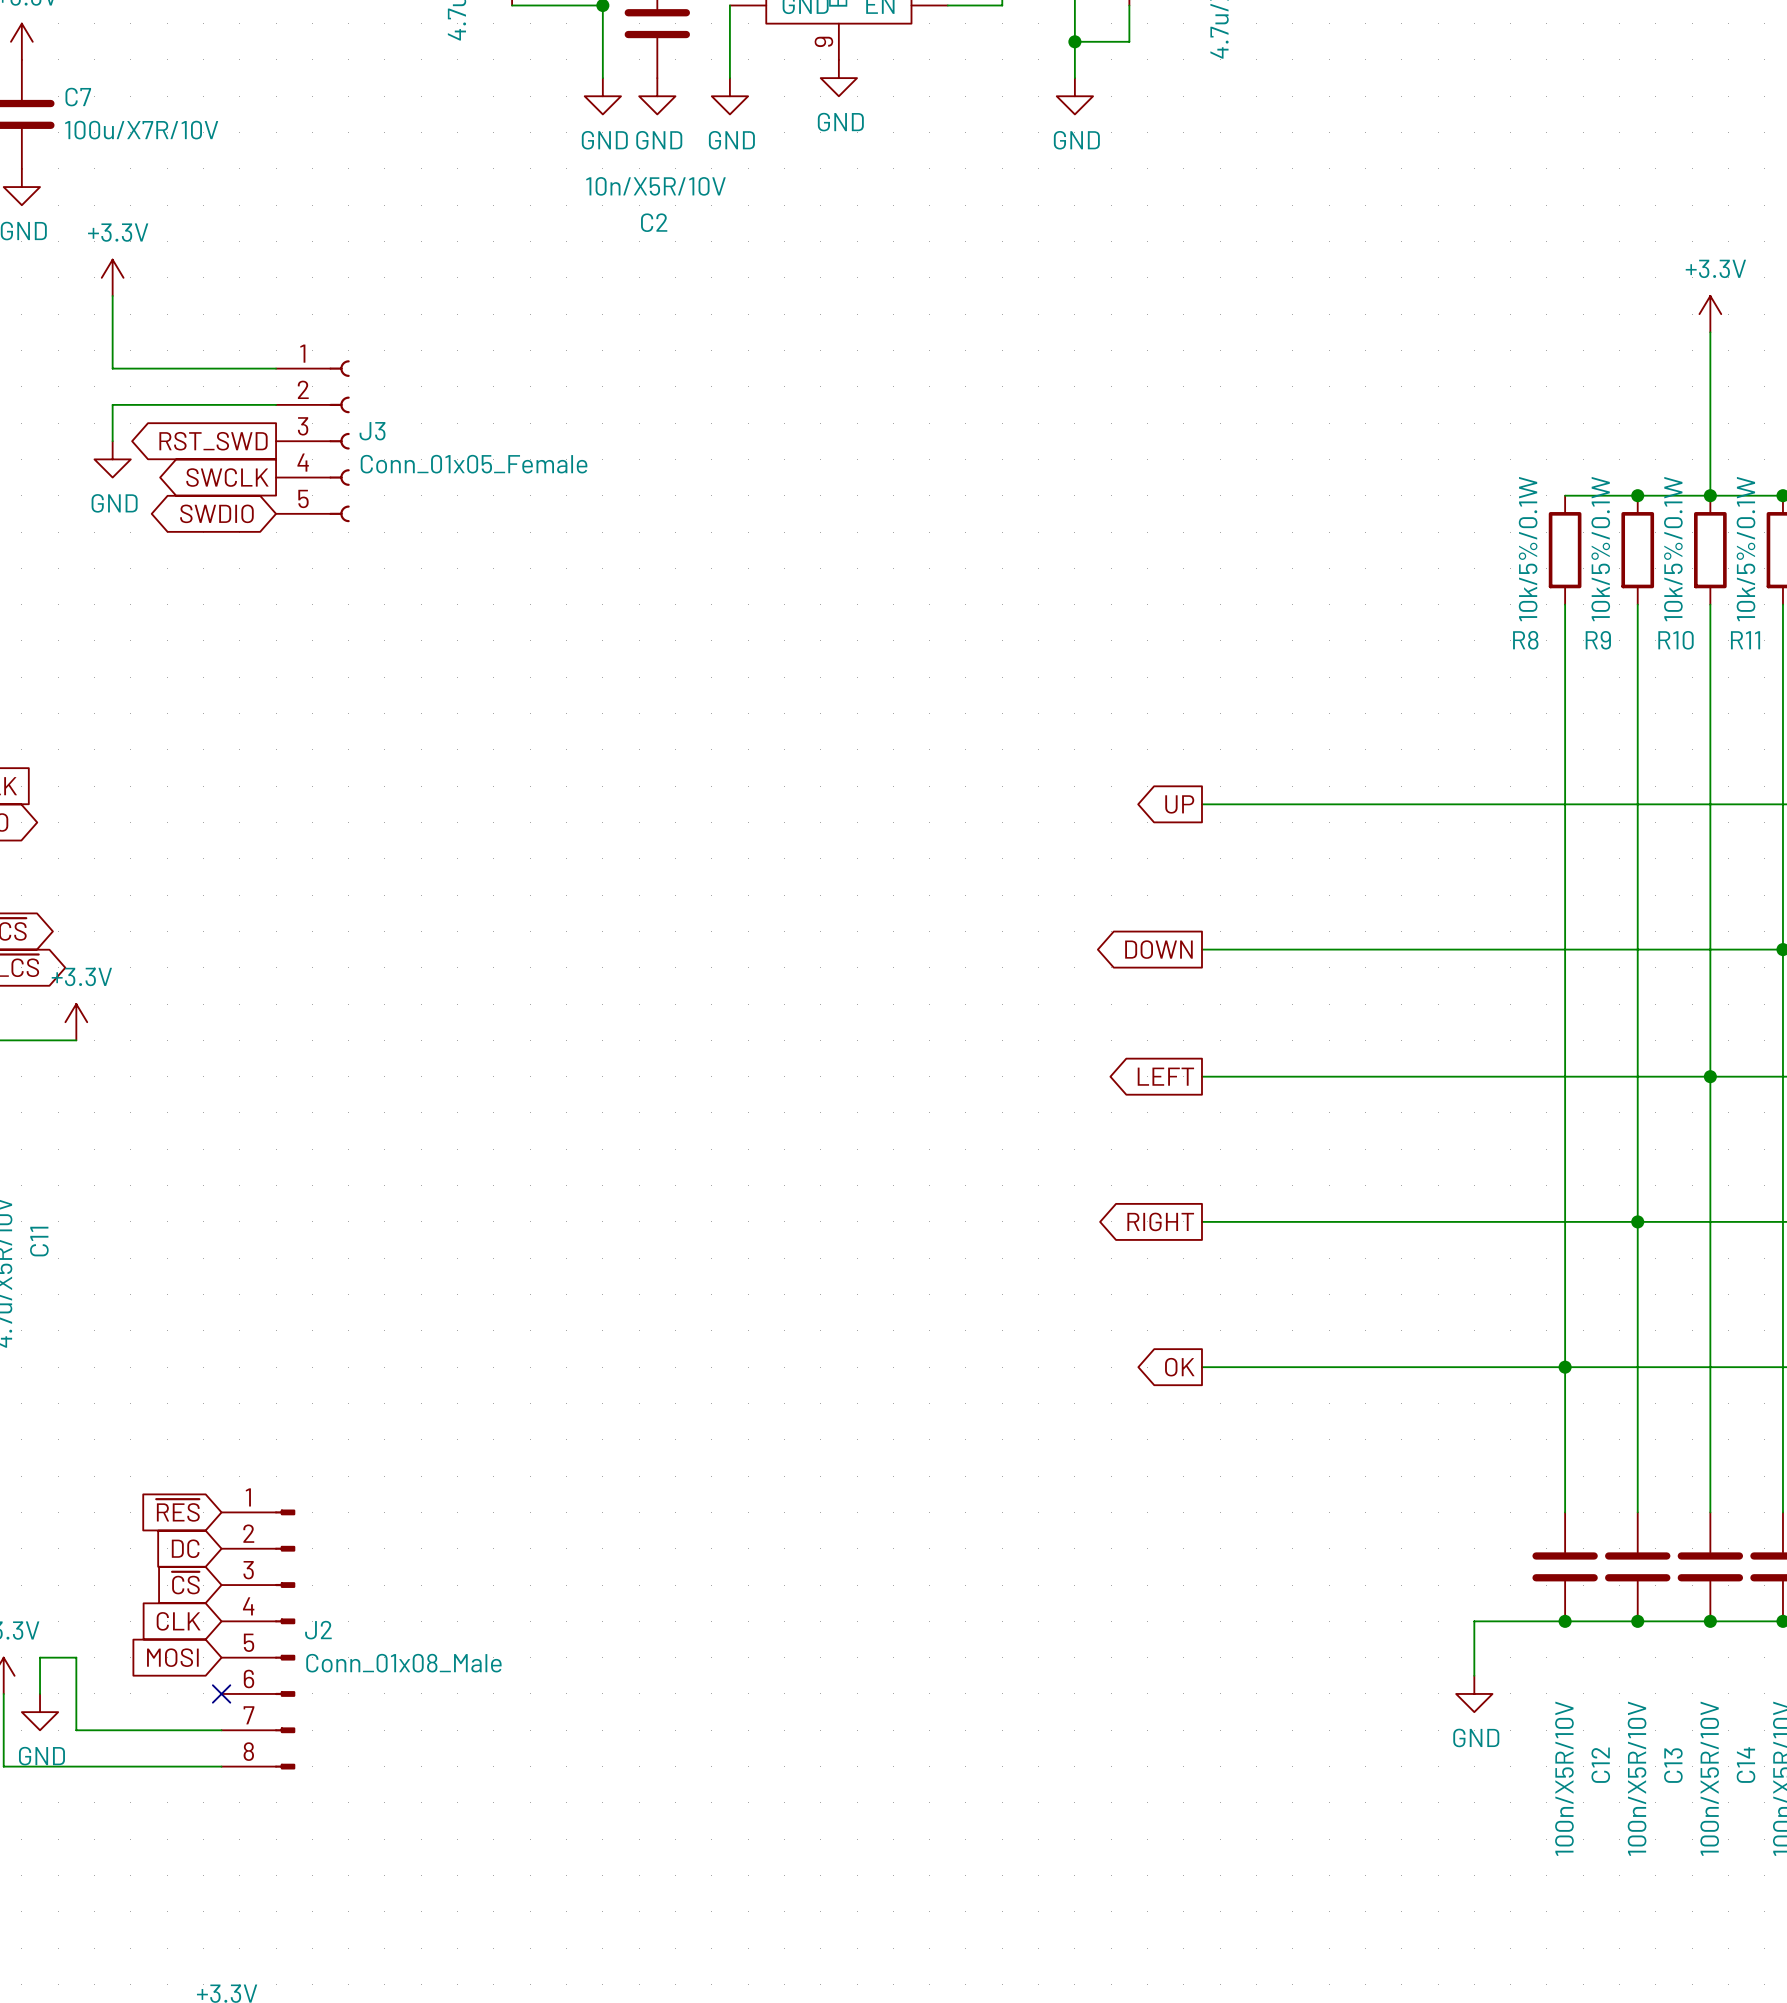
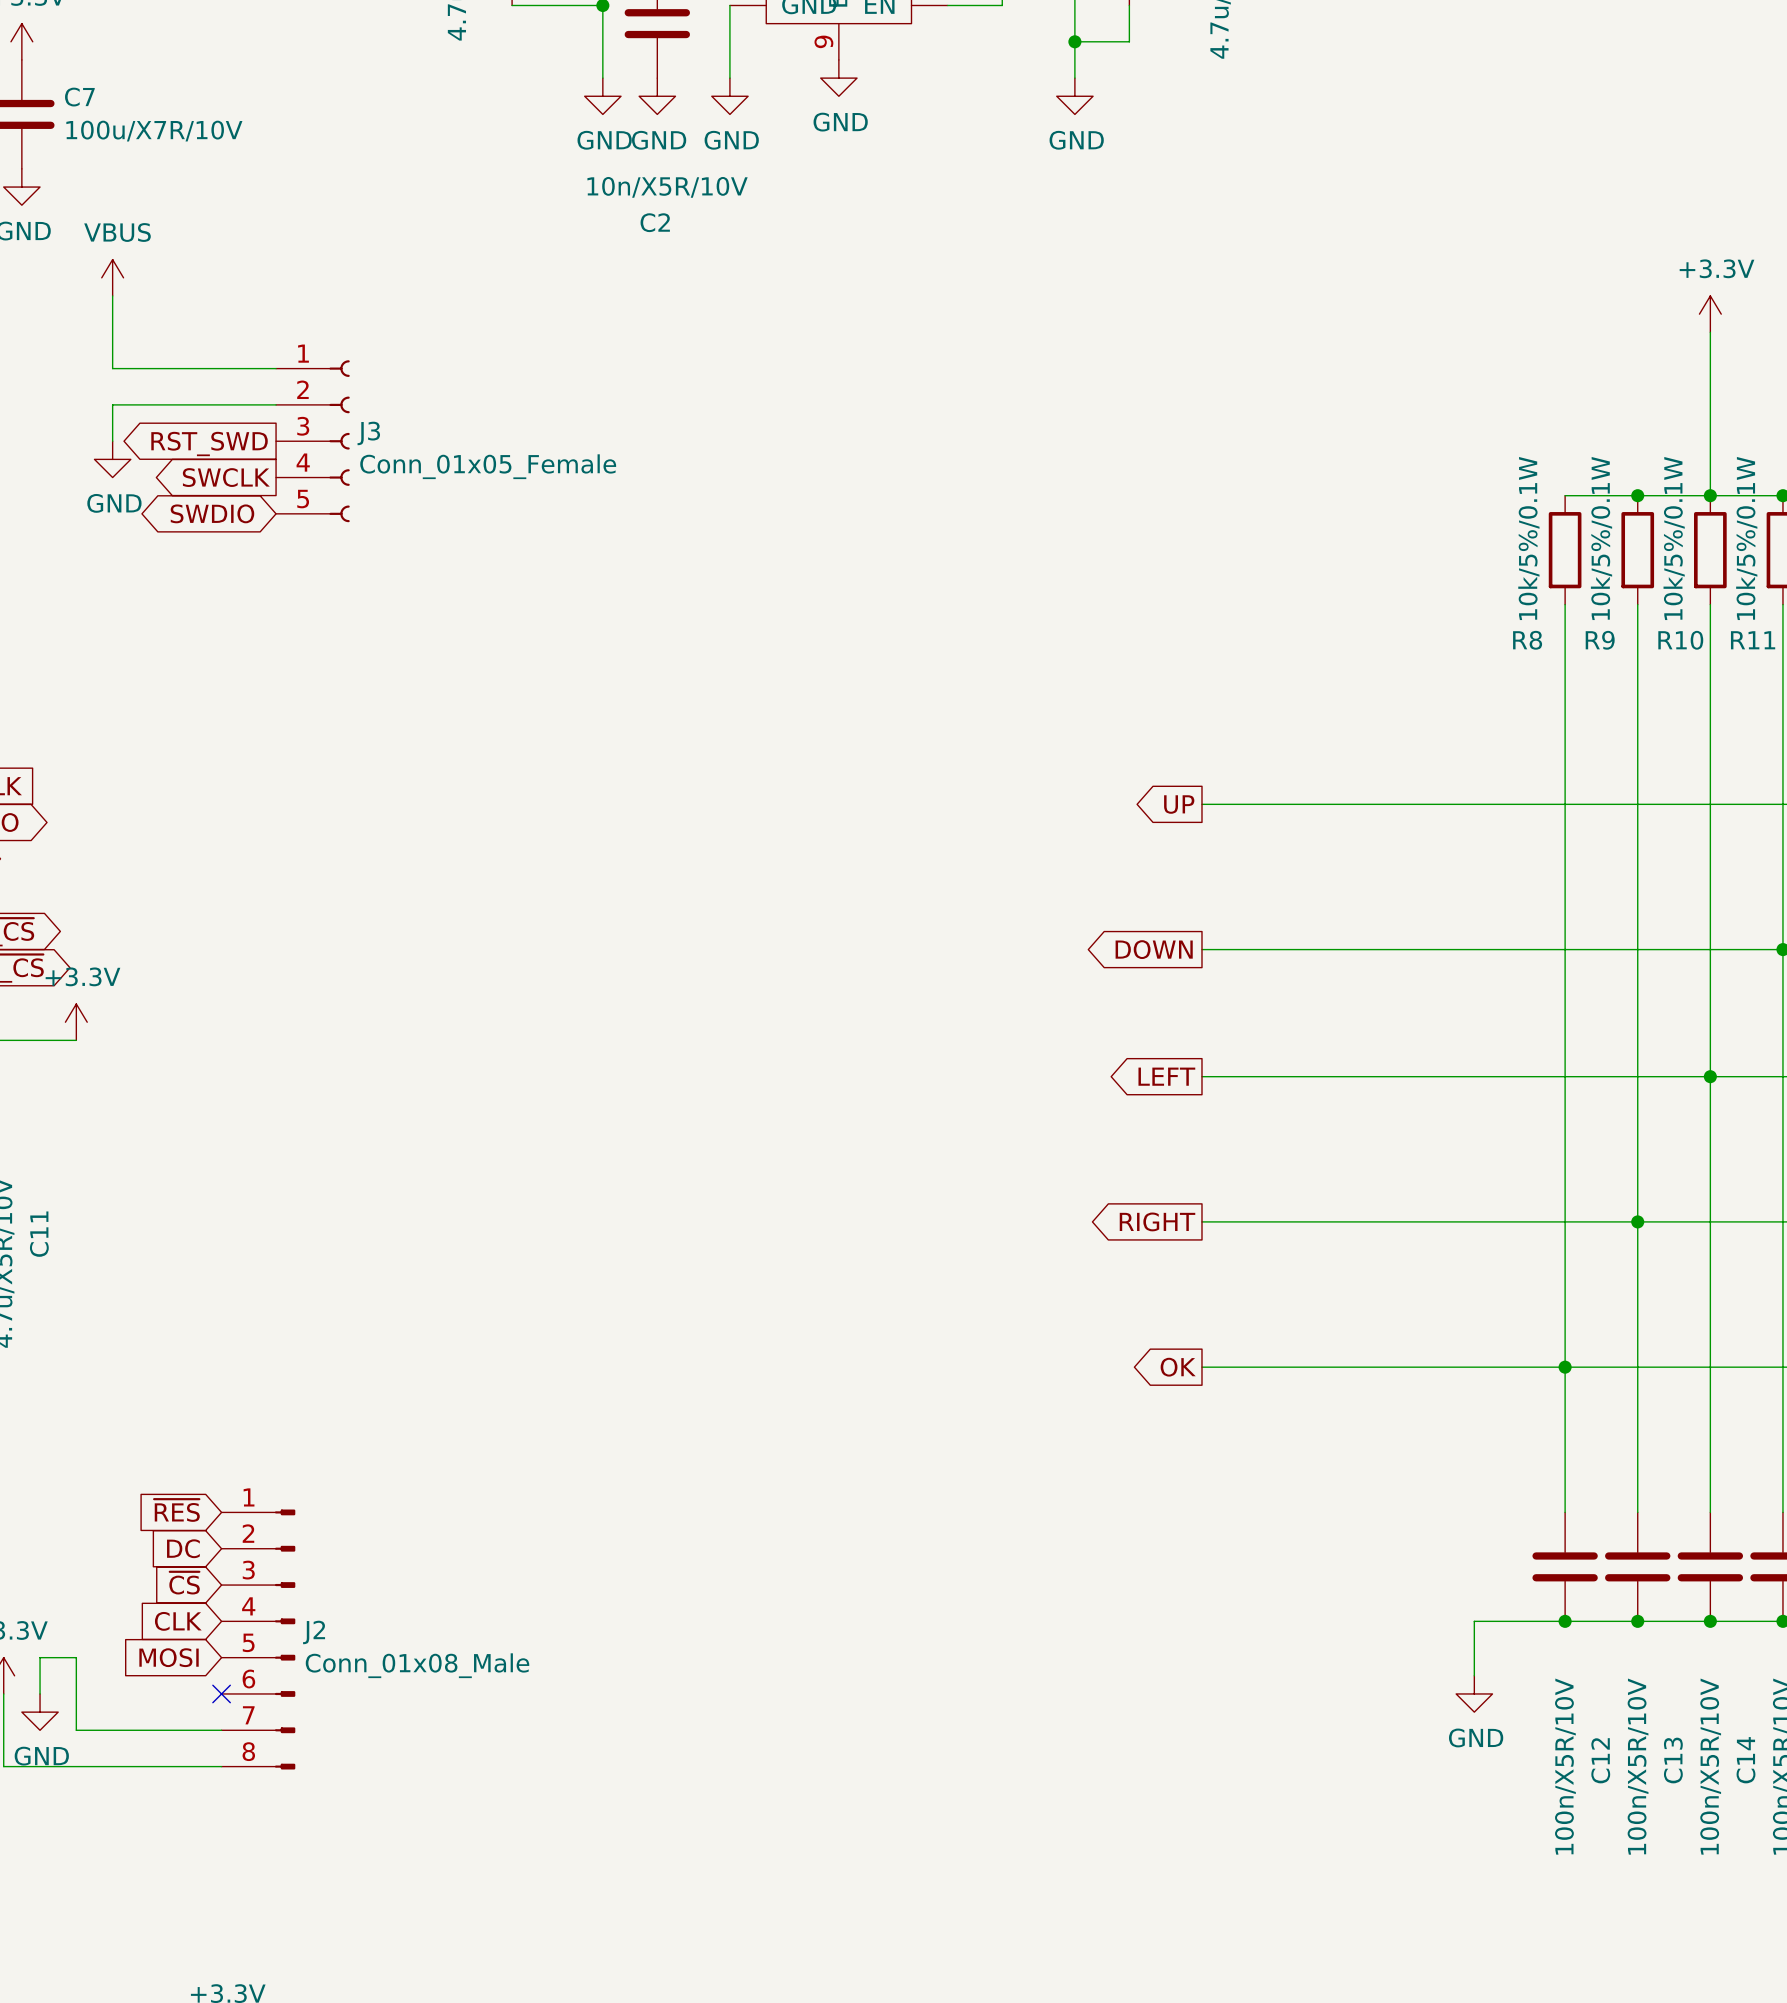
power symbol: +3.3V (112, 277) -> VBUS (112, 277)

